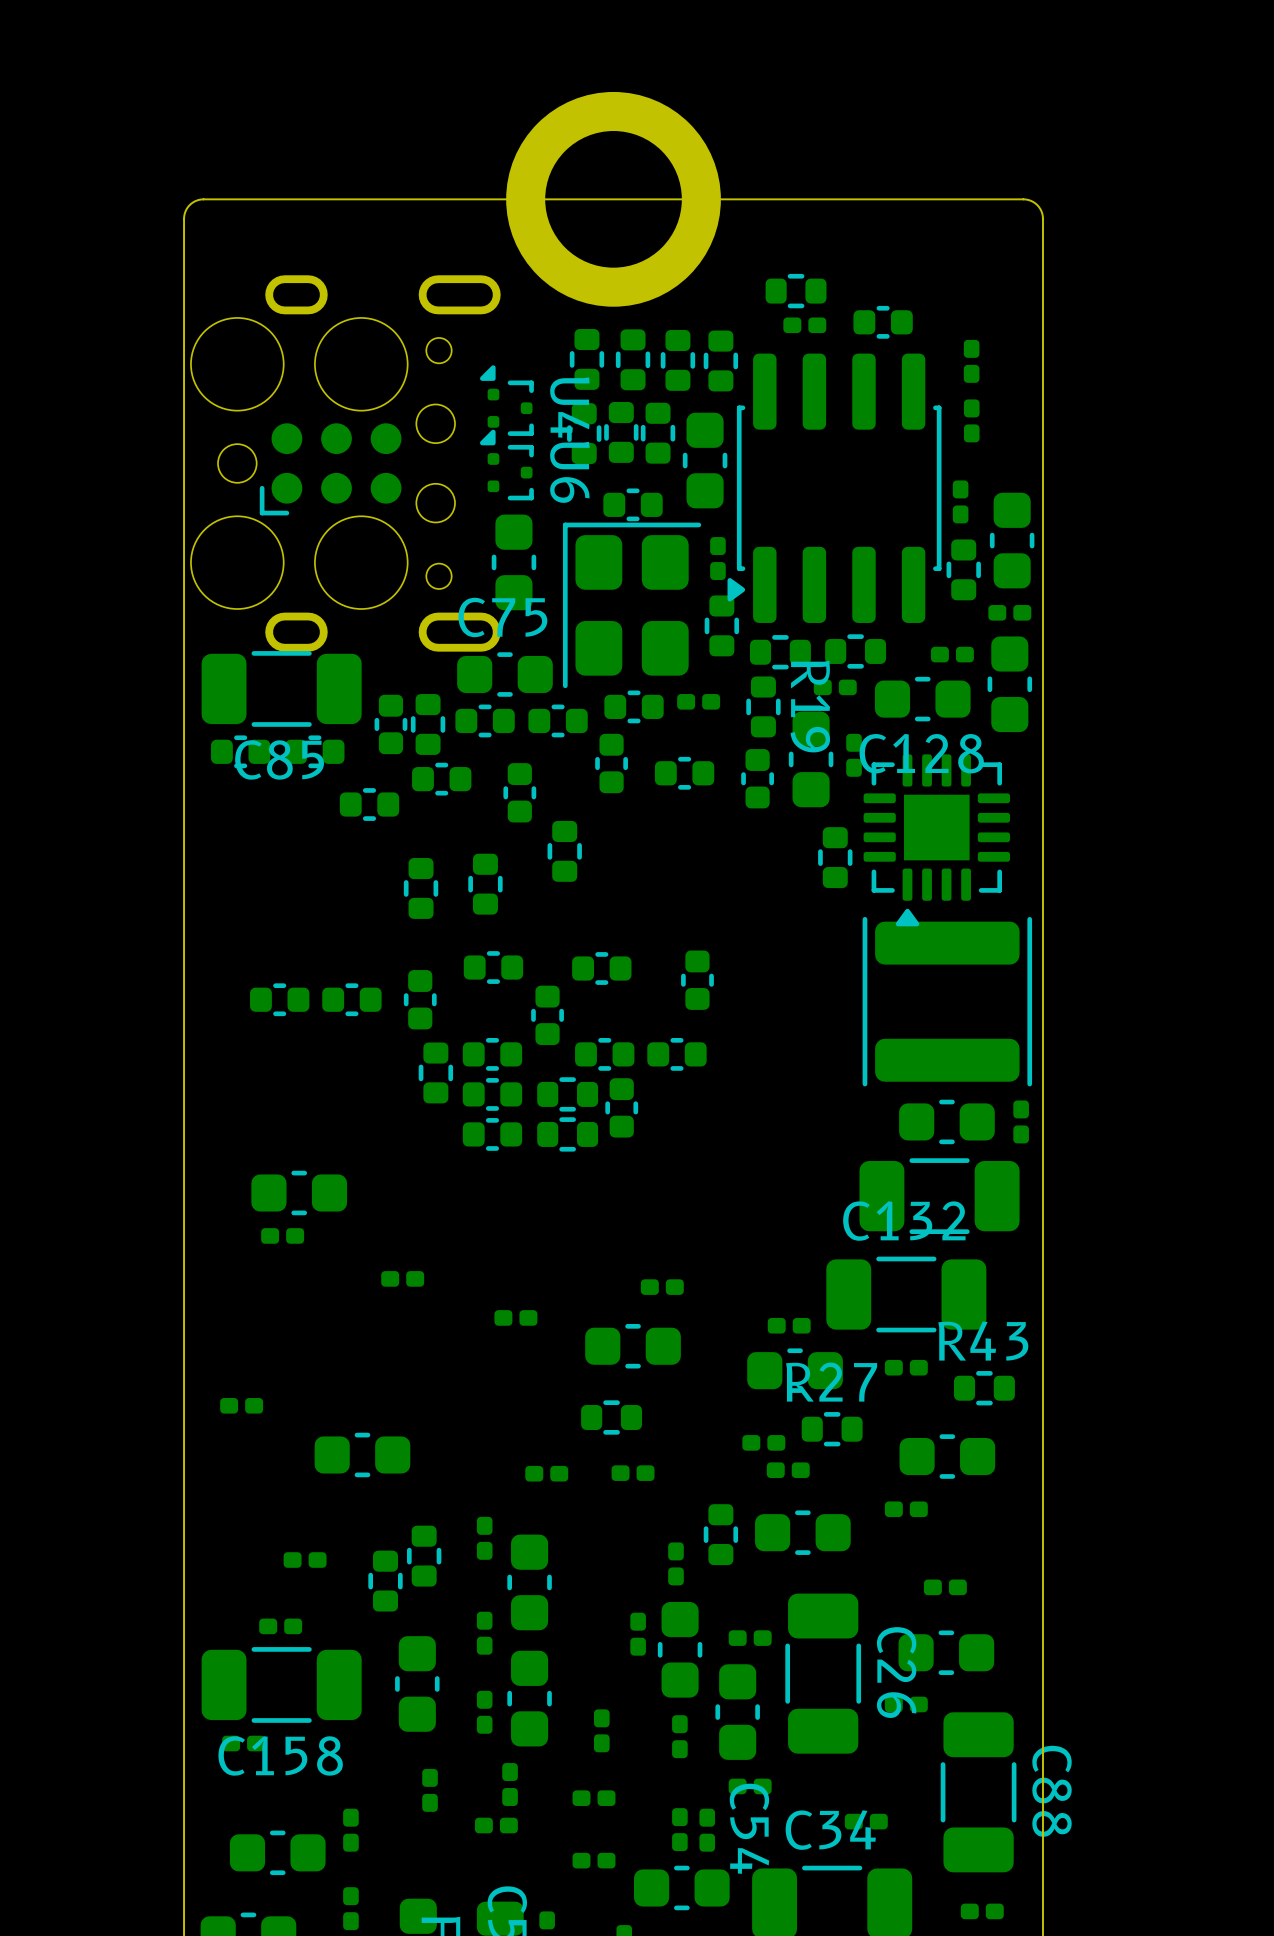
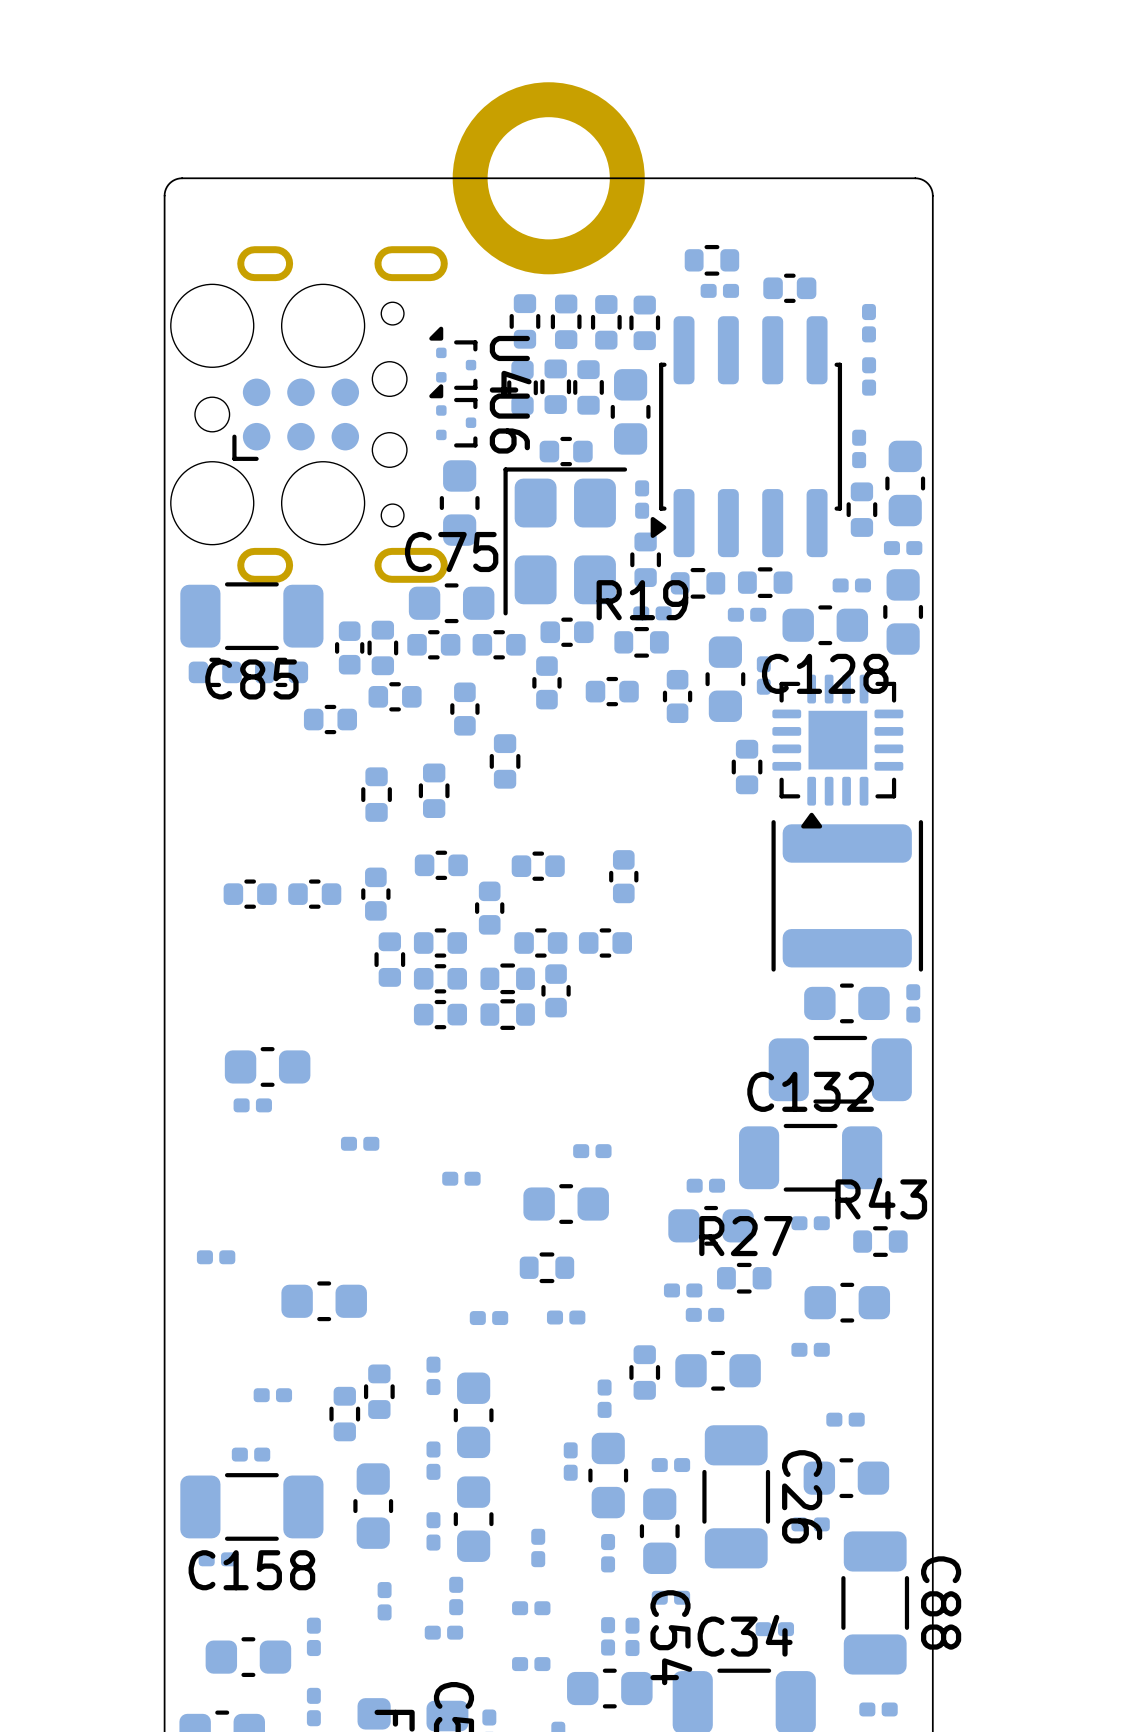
part position: (698, 701) -> (652, 613)
R19 rotation: 0° (763, 706) -> 90° clockwise (641, 642)
R19 position: (763, 706) -> (641, 642)

